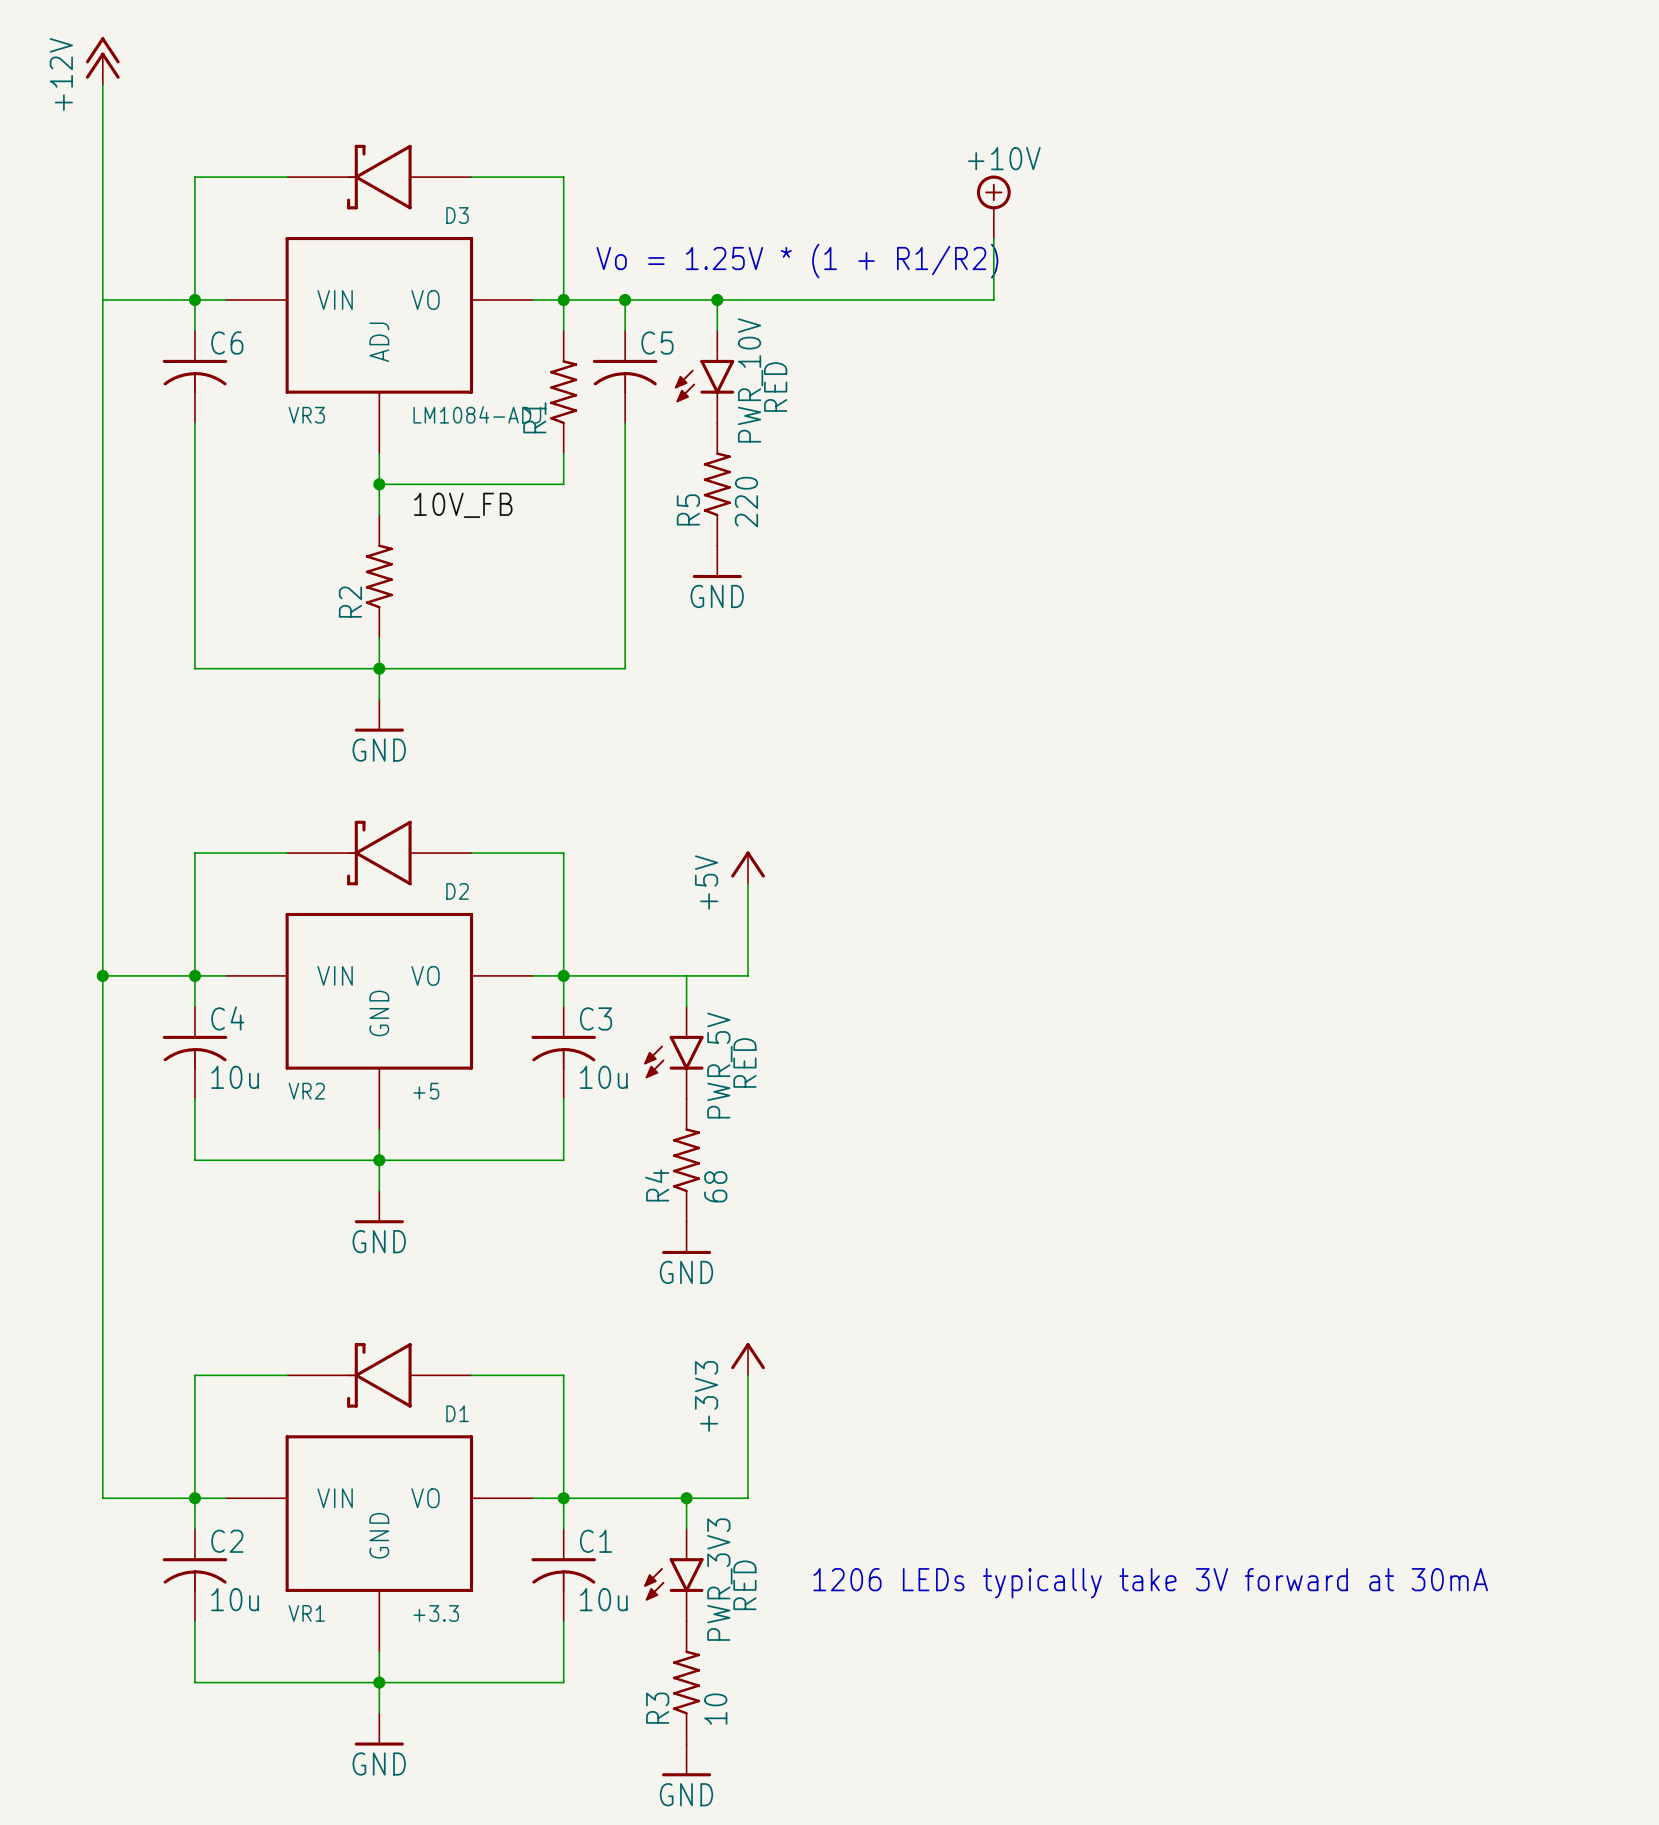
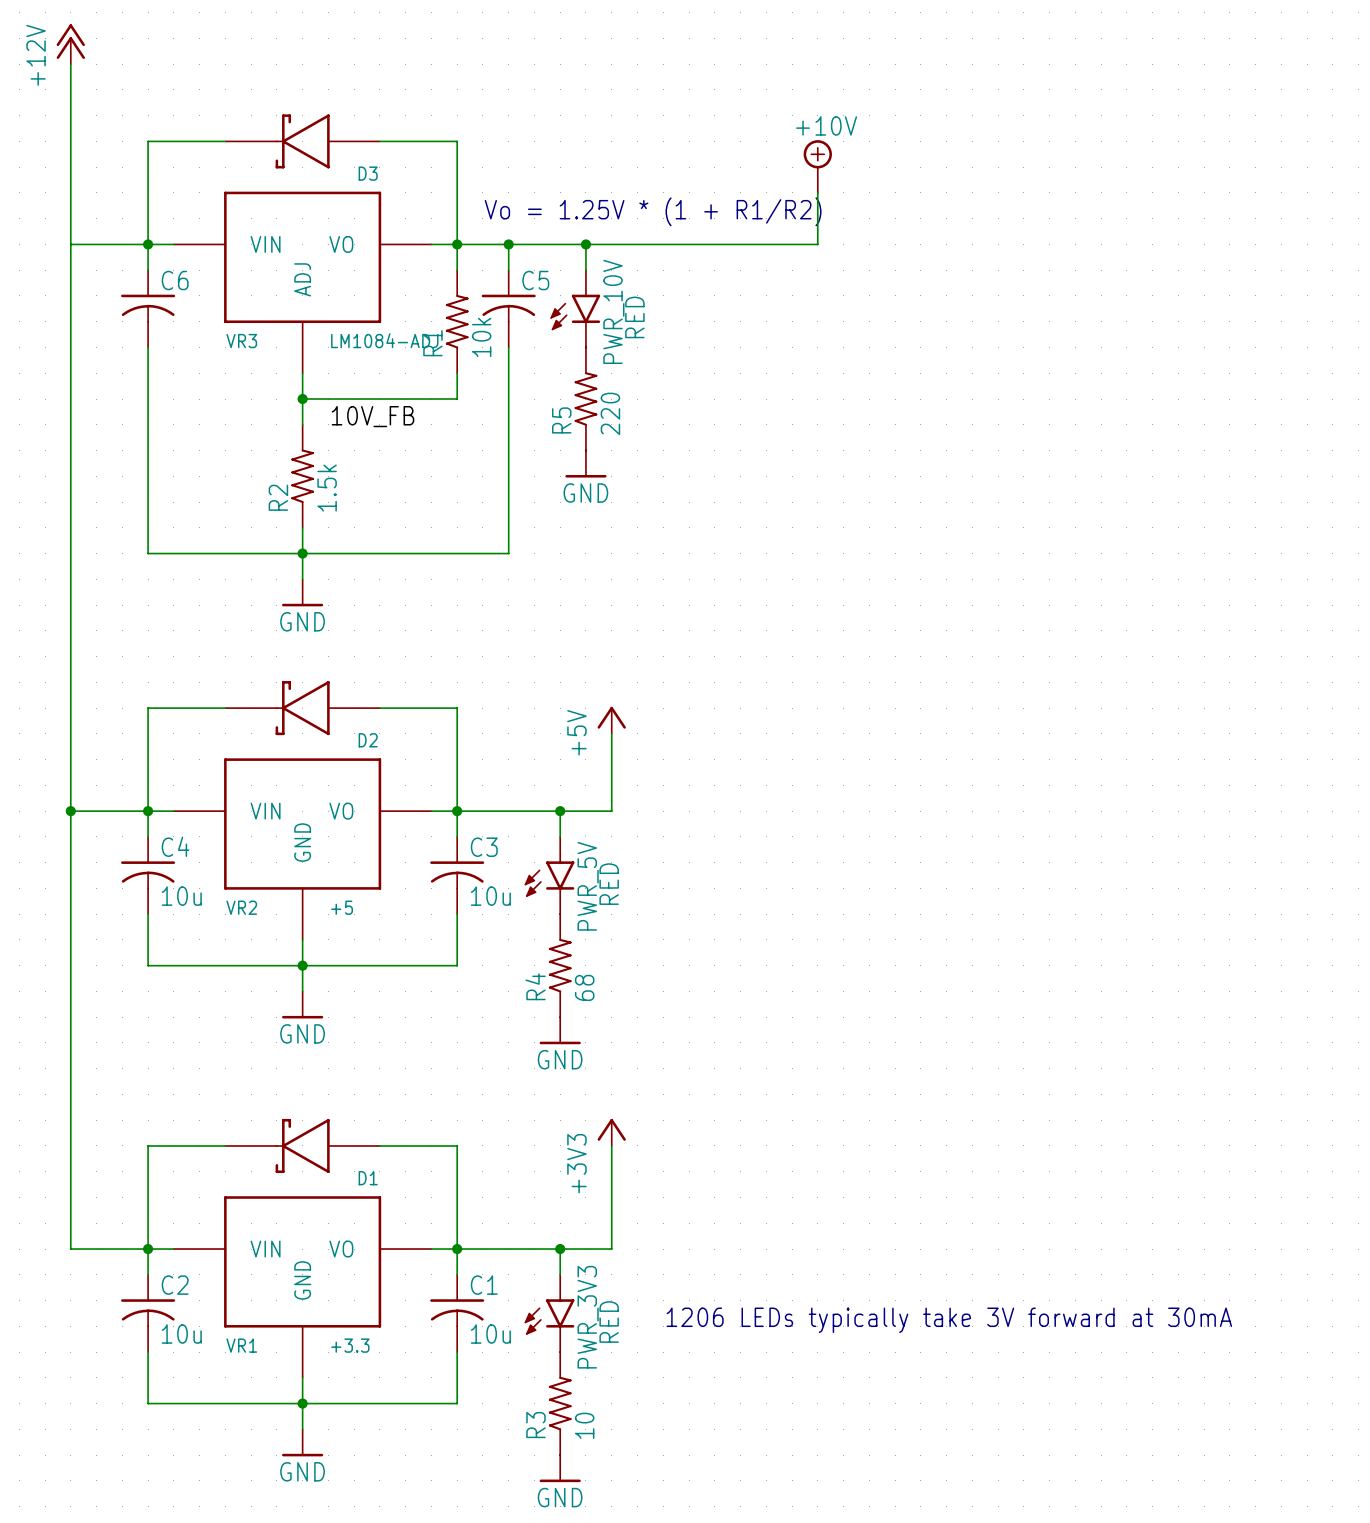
R1 value: none -> 10k (481, 337)
R2 value: none -> 1.5k (327, 488)
junction: none -> (560, 811)

